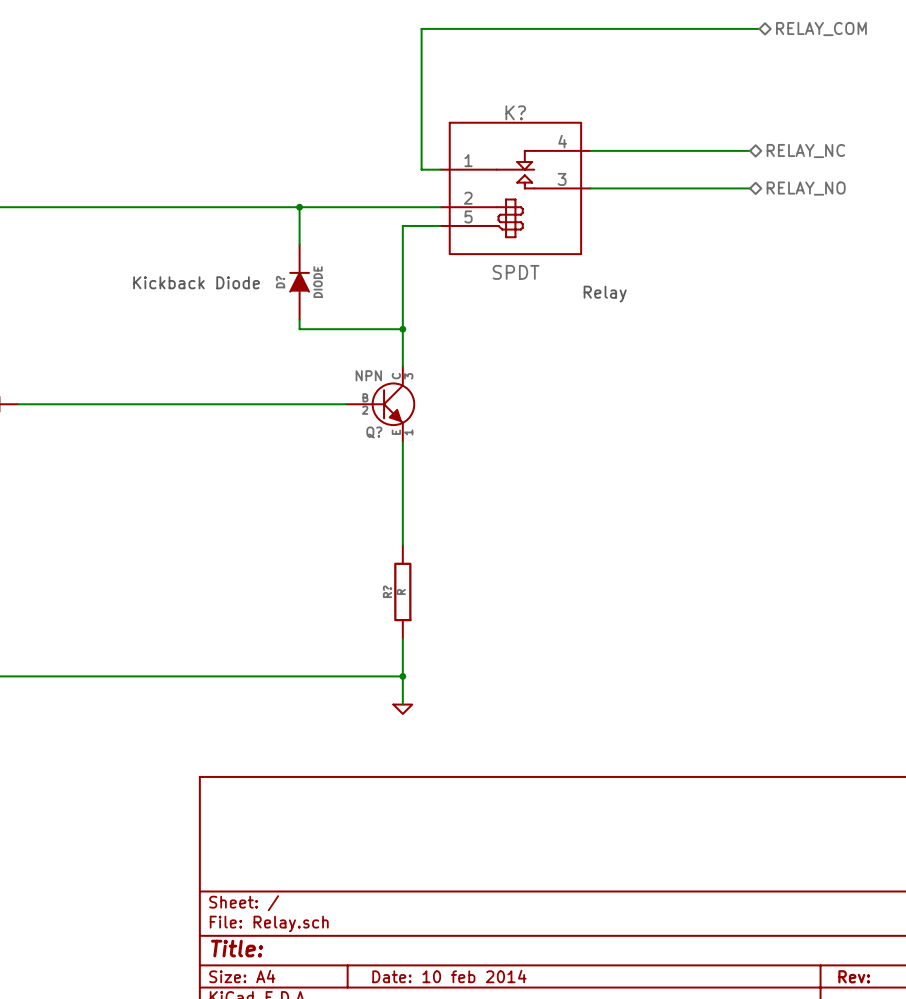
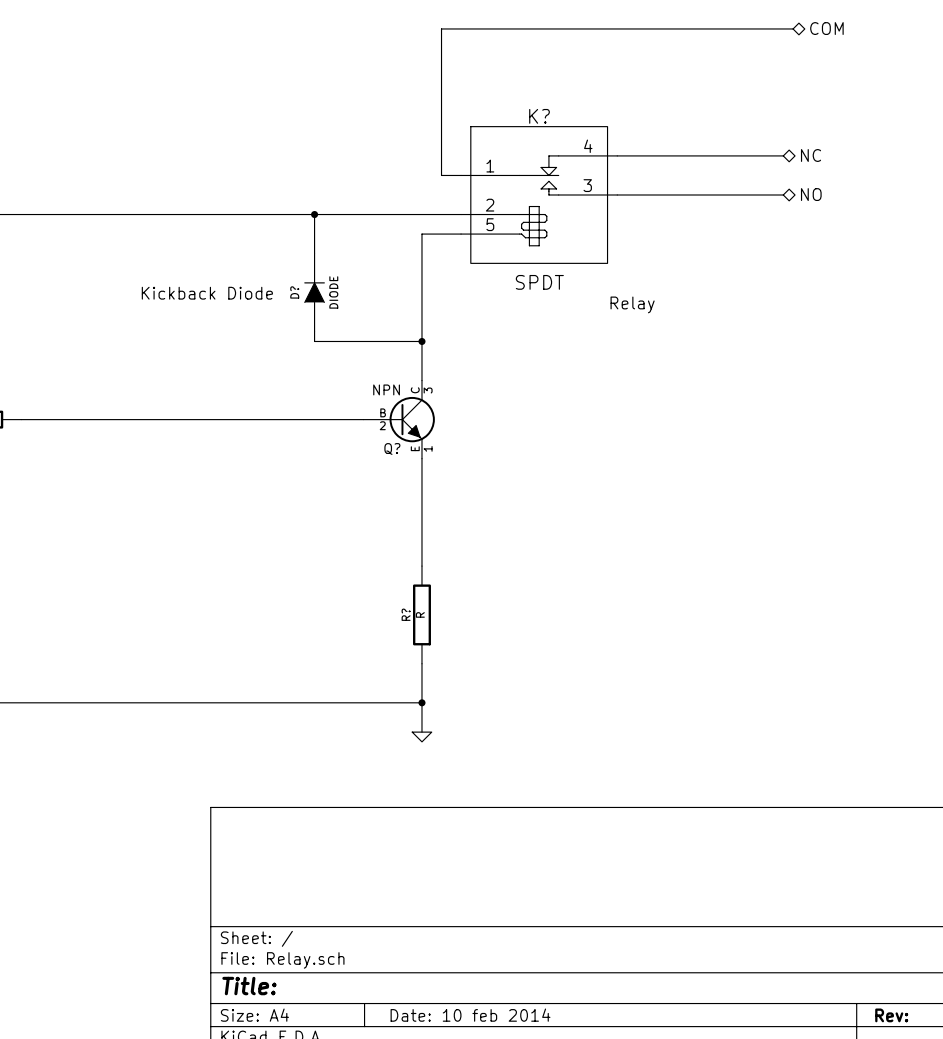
hierarchical label: RELAY_COM (821, 29) -> COM (826, 28)
hierarchical label: RELAY_NC (805, 151) -> NC (811, 155)
hierarchical label: RELAY_NO (806, 188) -> NO (811, 194)

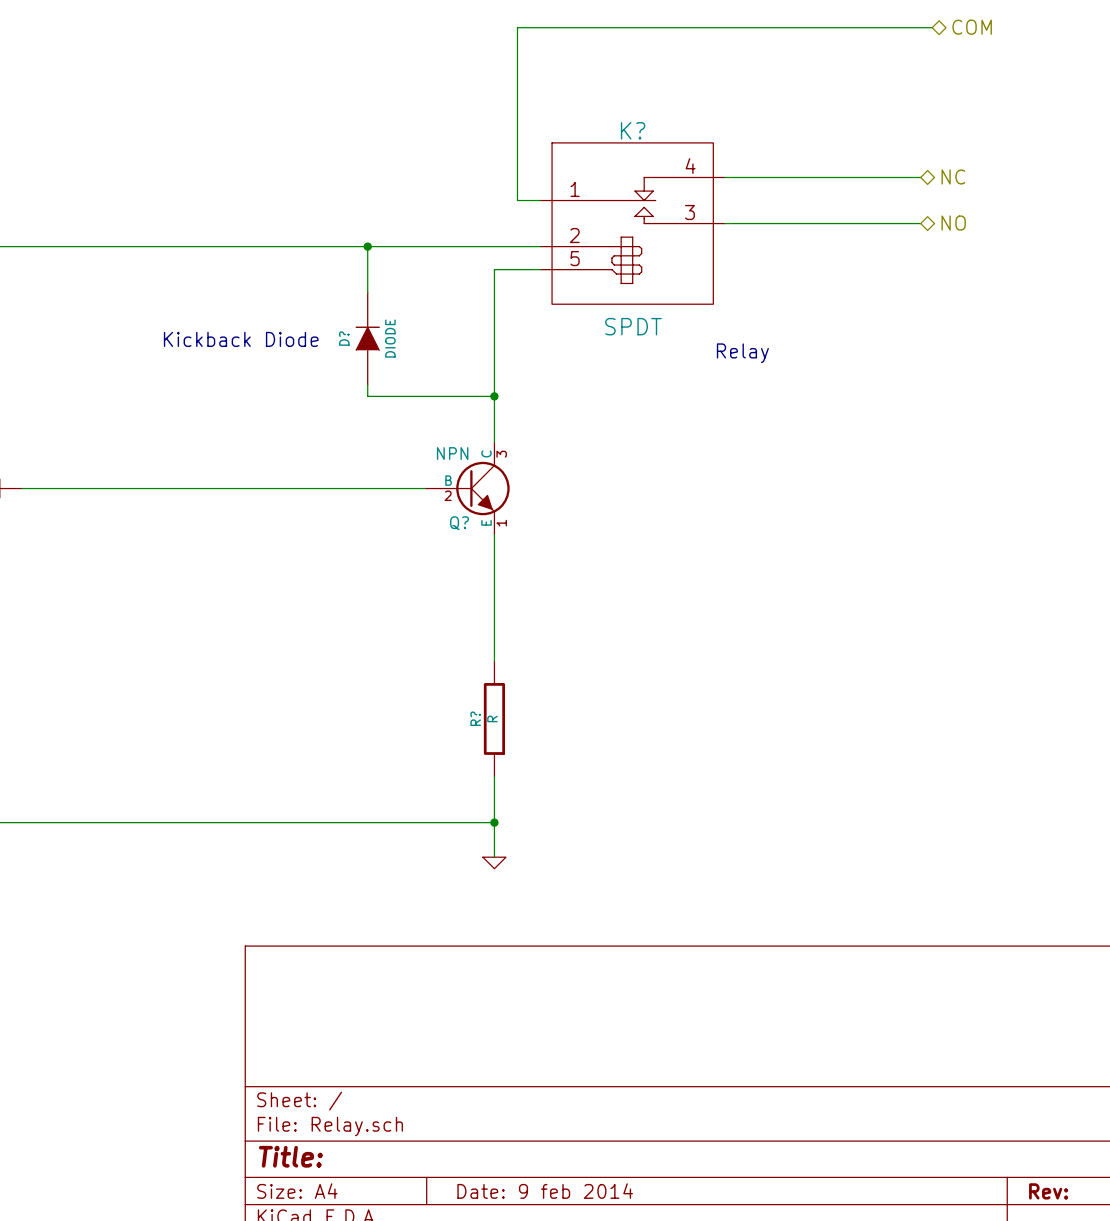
title block: Date: 10 feb 2014 (470, 1015) -> Date: 9 feb 2014 (545, 1191)

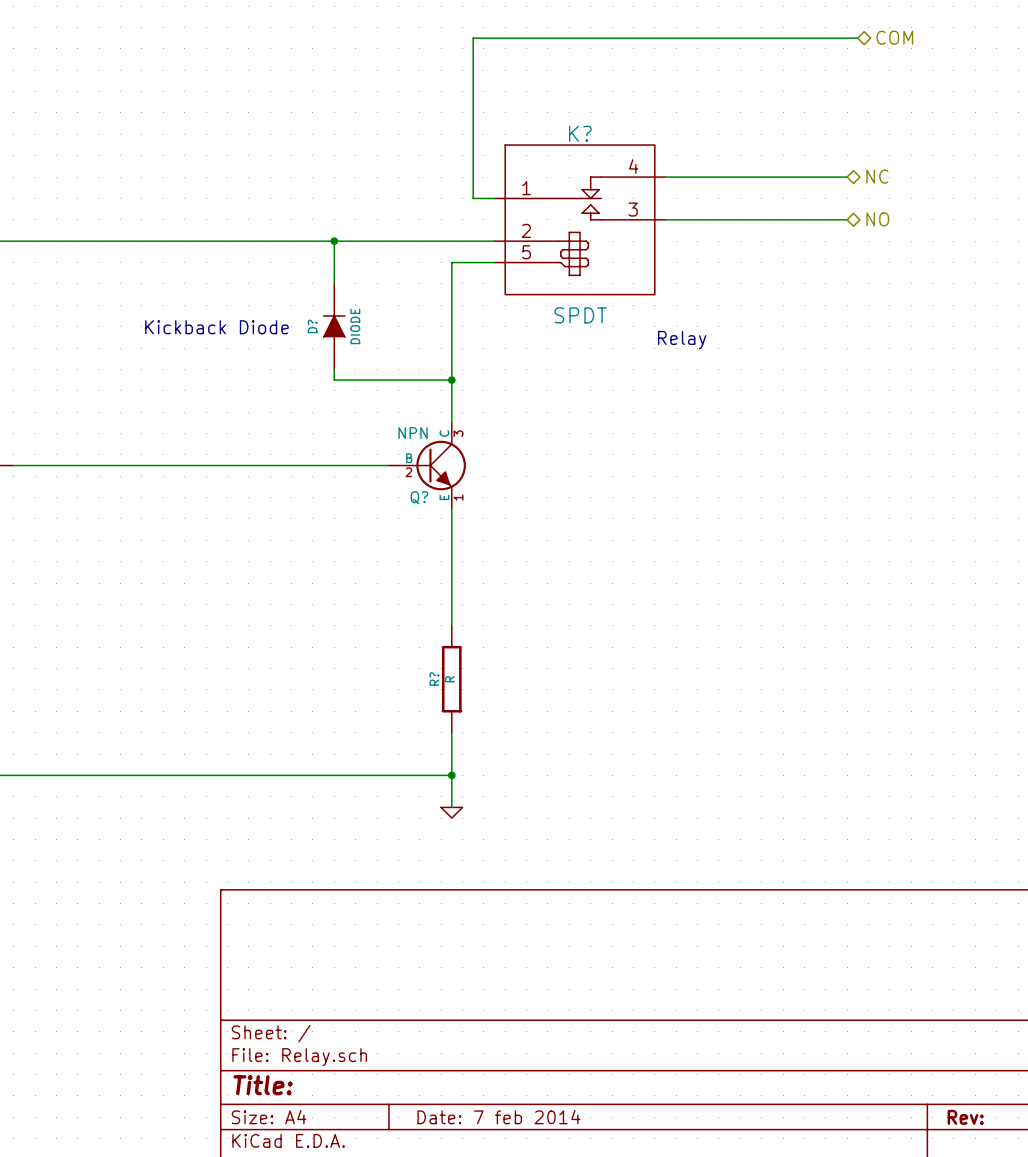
title block: Date: 9 feb 2014 (545, 1191) -> Date: 7 feb 2014 (498, 1117)

